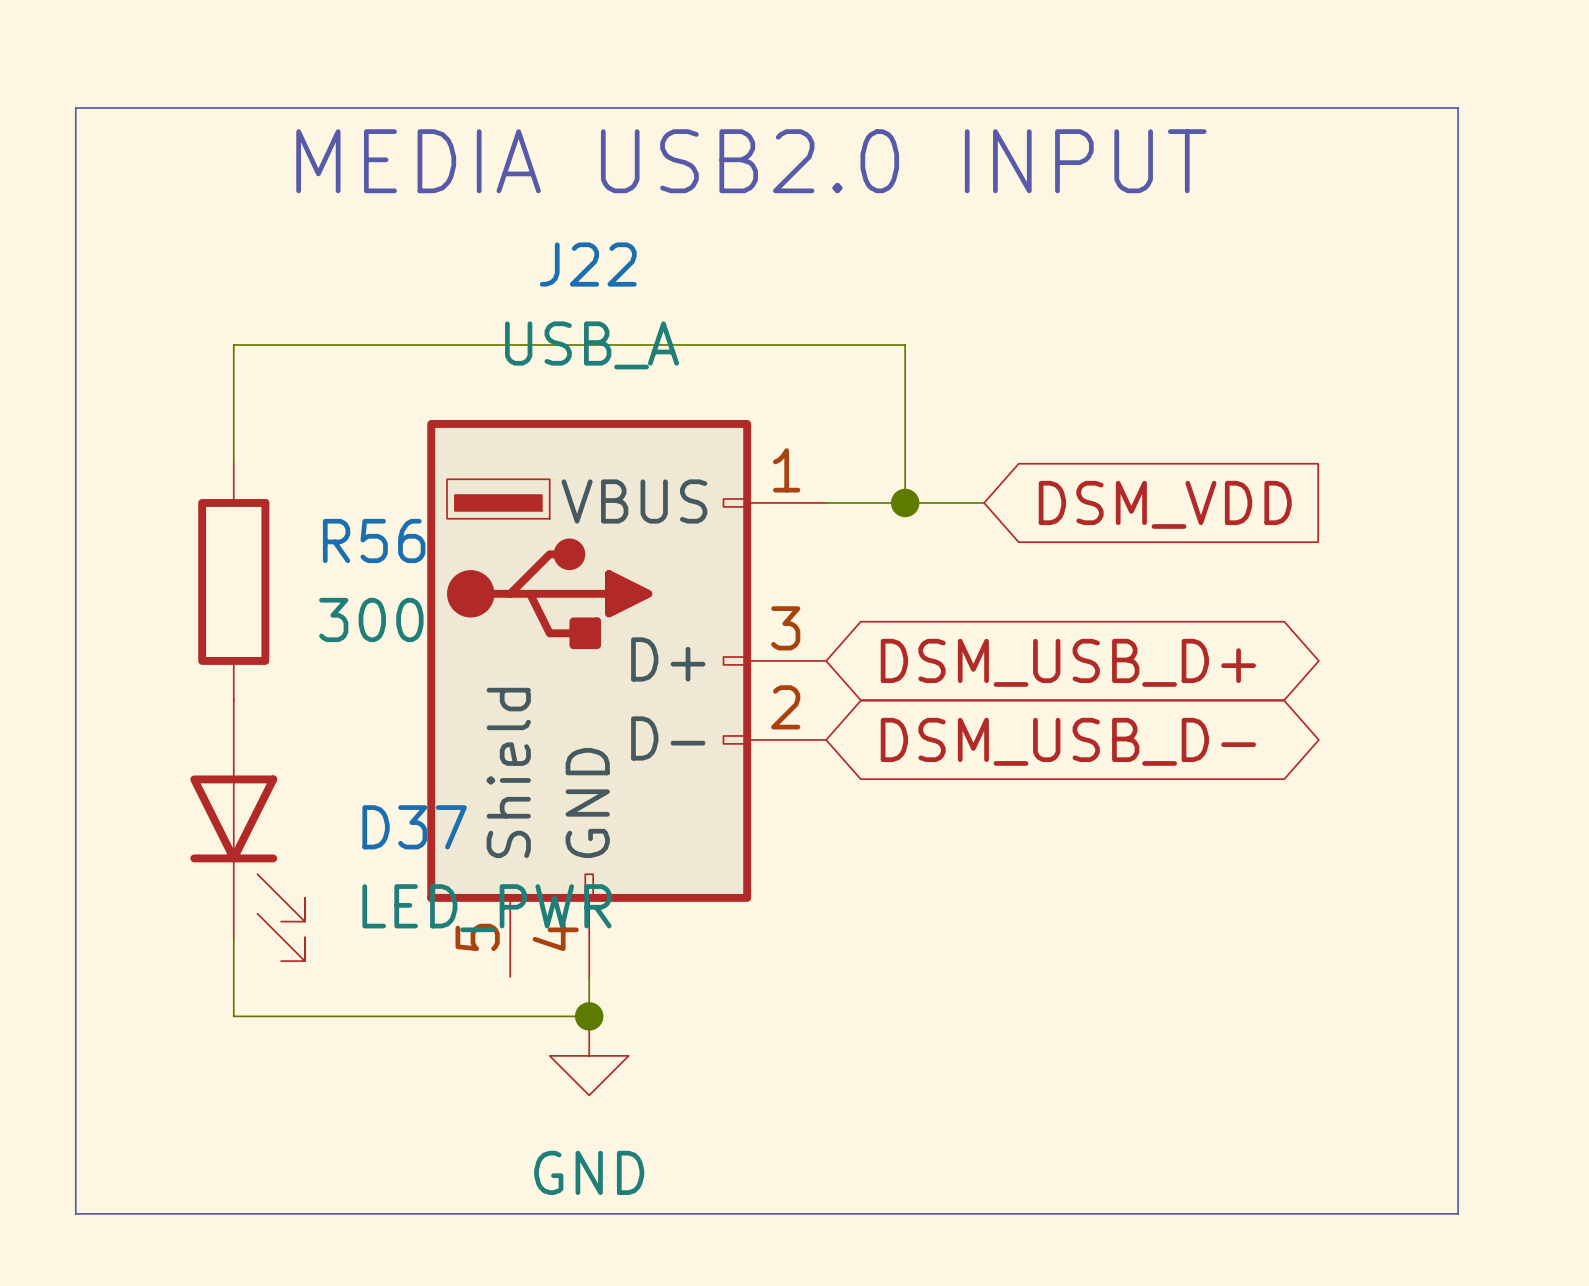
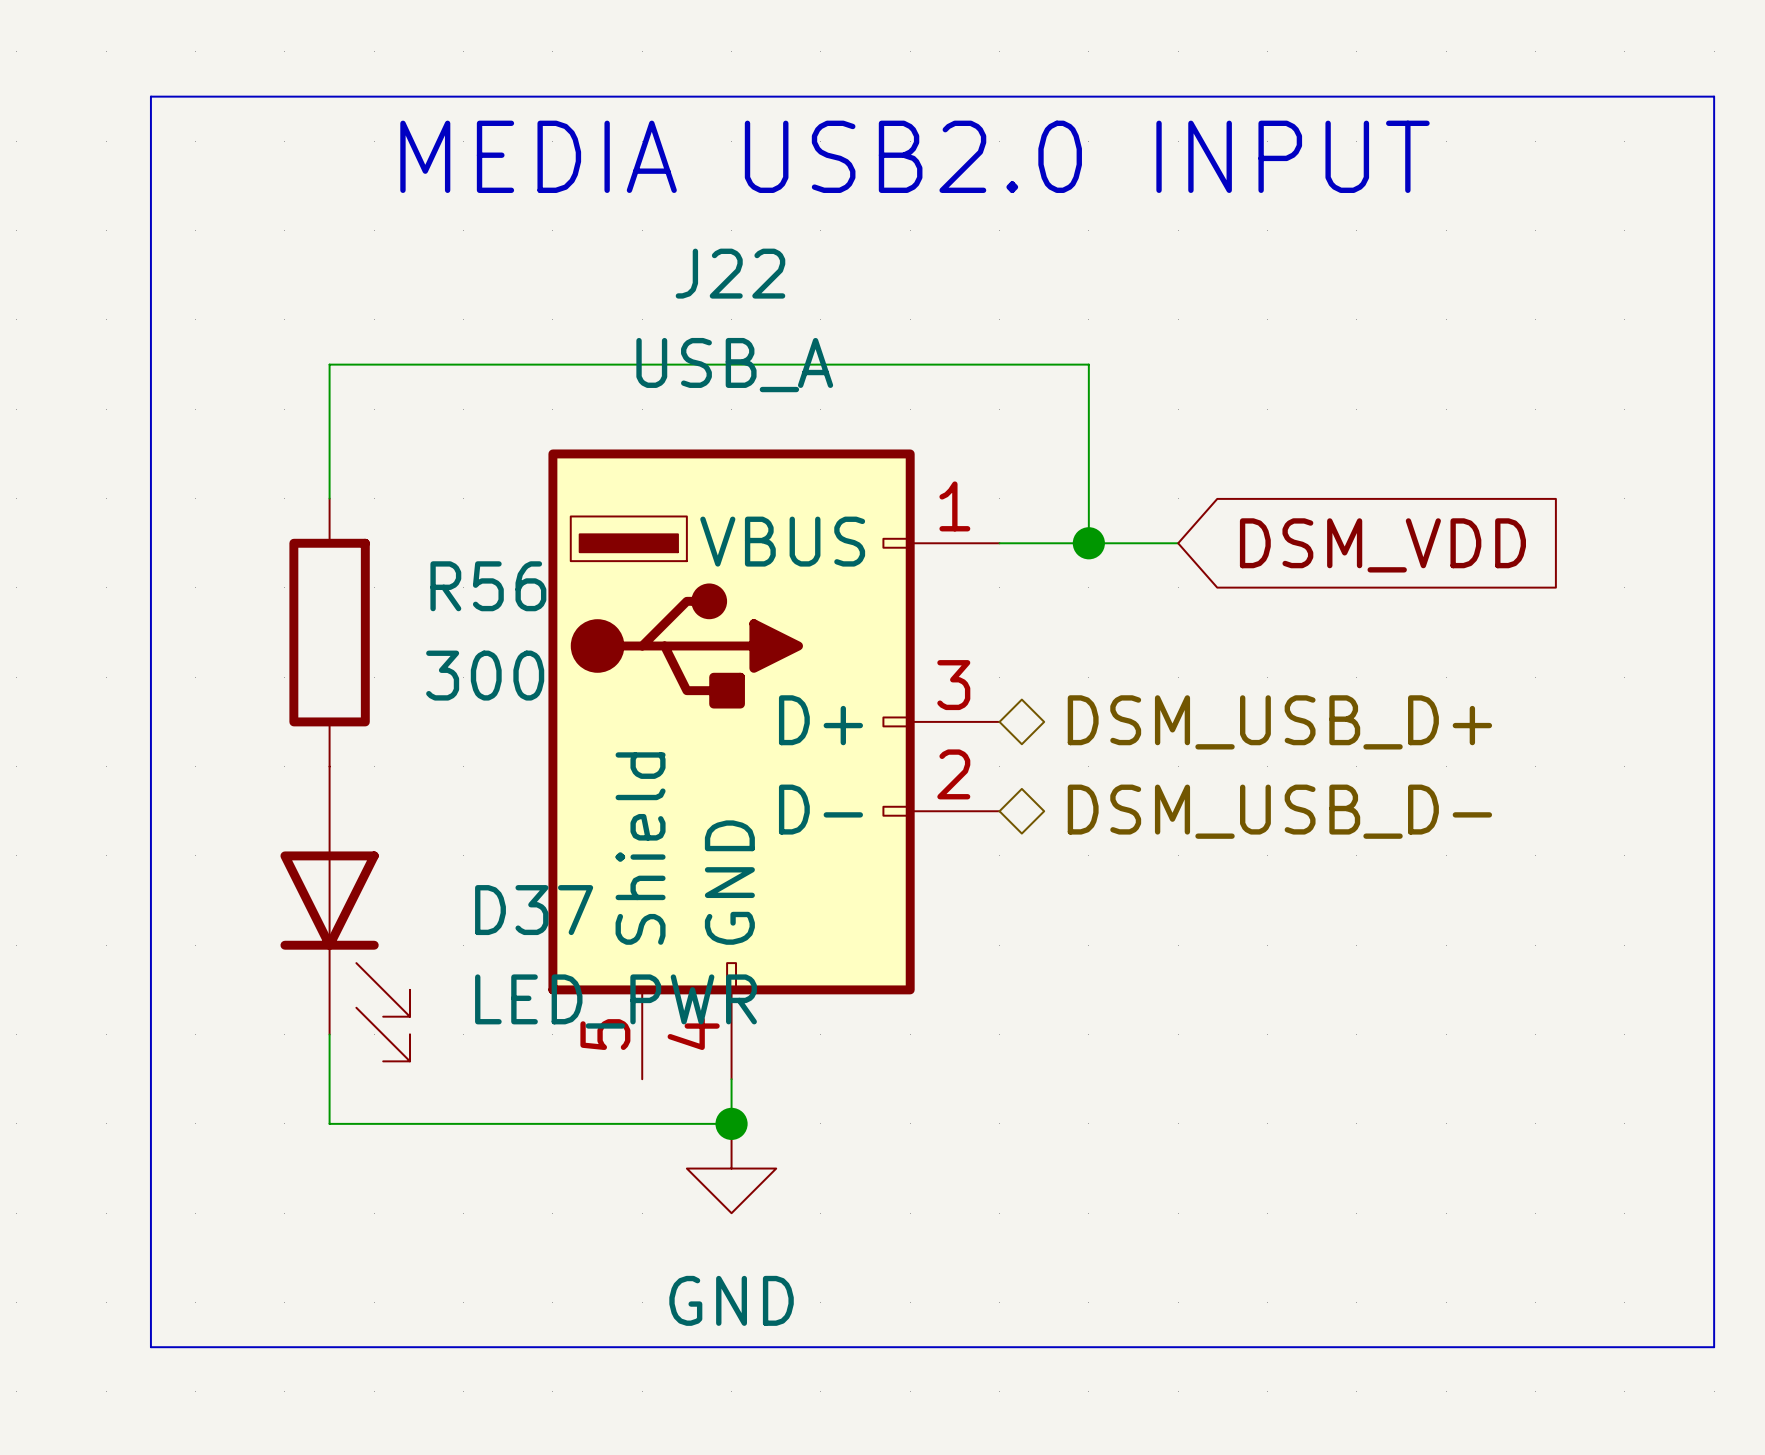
hierarchical label: none -> DSM_USB_D+ (1279, 722)
global label: DSM_USB_D+ (1068, 662) -> none
hierarchical label: none -> DSM_USB_D- (1279, 811)
global label: DSM_USB_D- (1068, 741) -> none

